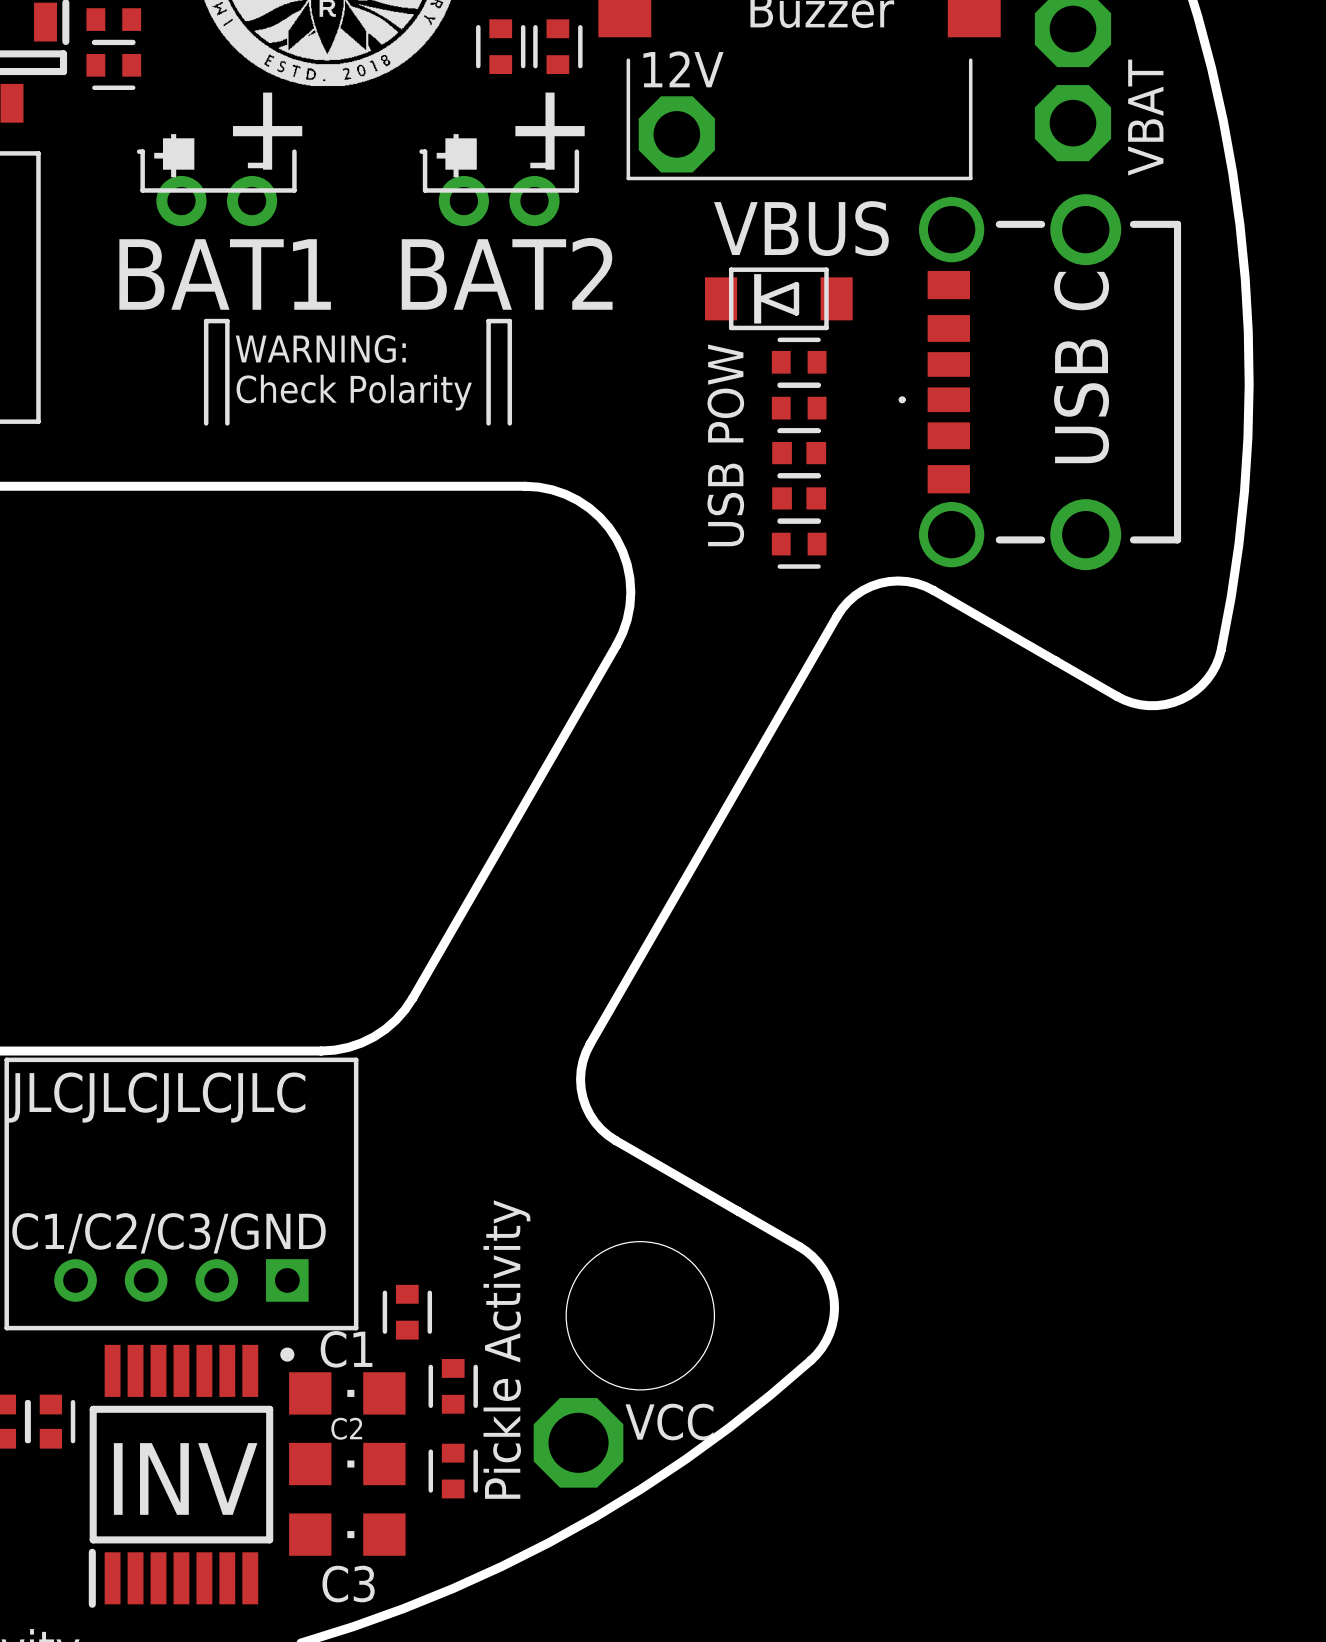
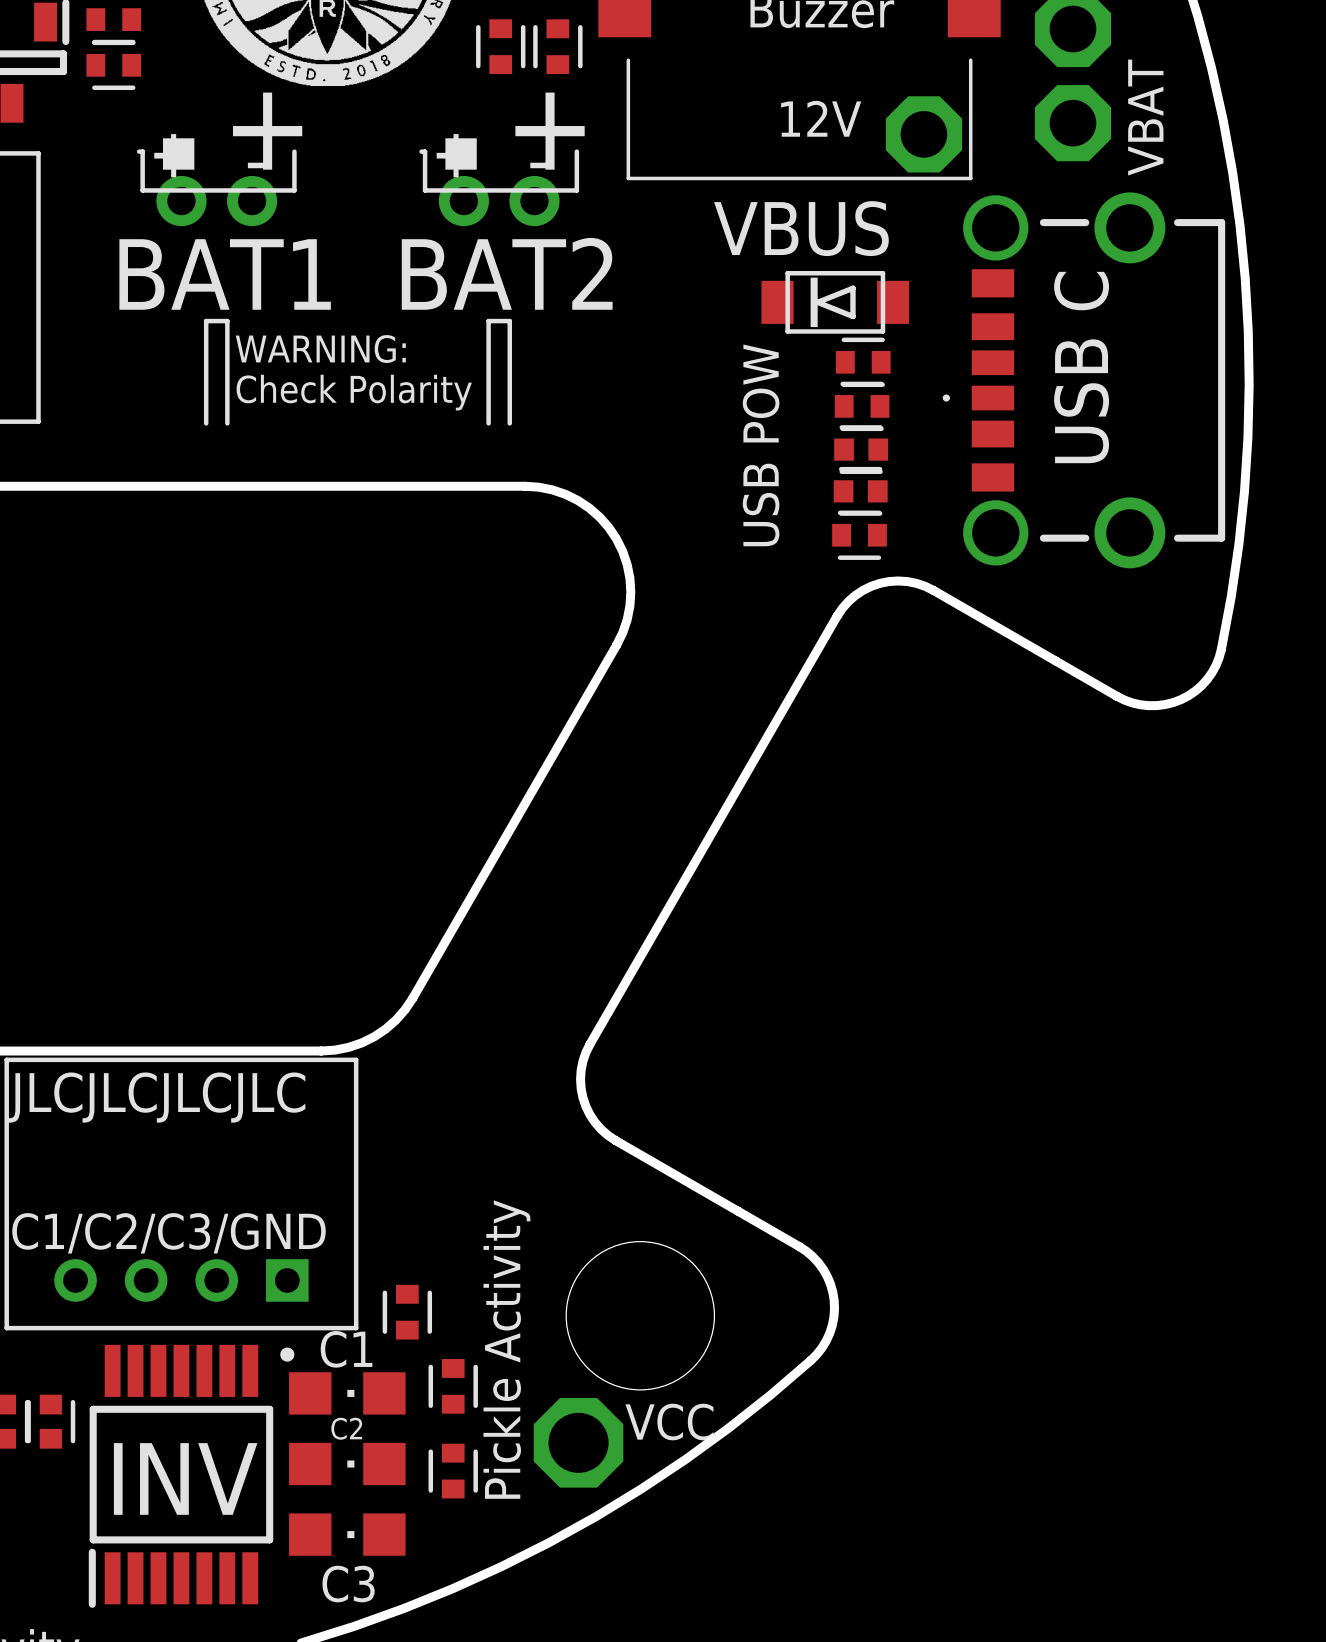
text position: 12V (683, 69) -> 12V (821, 118)
part position: (676, 134) -> (923, 134)
part position: (778, 298) -> (835, 302)
part: (799, 362) -> none
part: none -> (863, 362)
part position: (1039, 382) -> (1084, 380)
part: none -> (862, 406)
part: (799, 408) -> none
text position: USB POW (725, 445) -> USB POW (761, 445)
part: none -> (861, 449)
part: (799, 453) -> none
part: none -> (860, 491)
part: (799, 498) -> none
part position: (799, 544) -> (859, 535)

